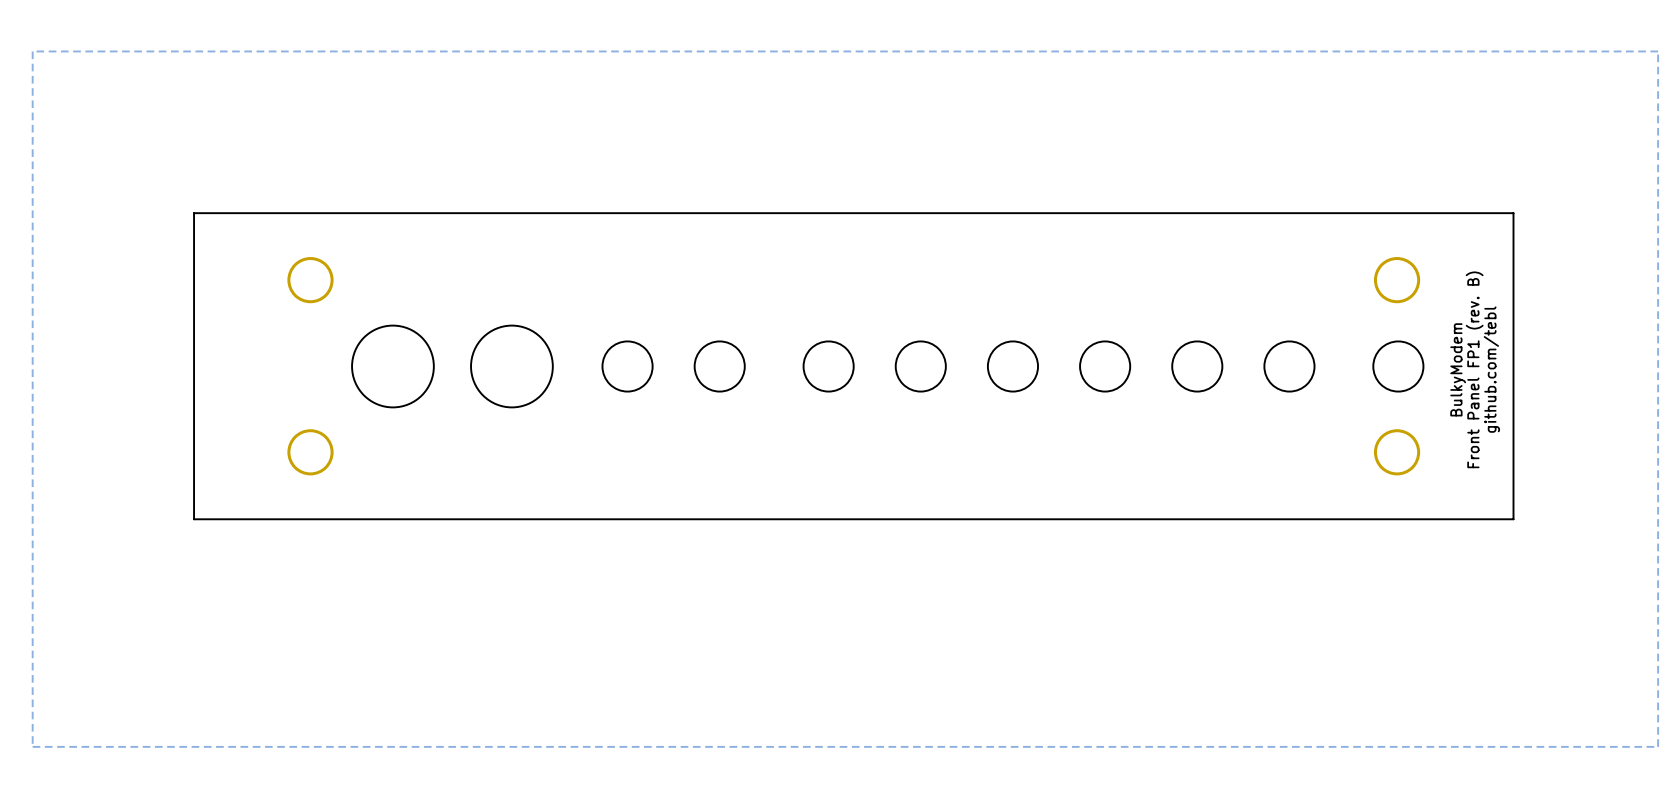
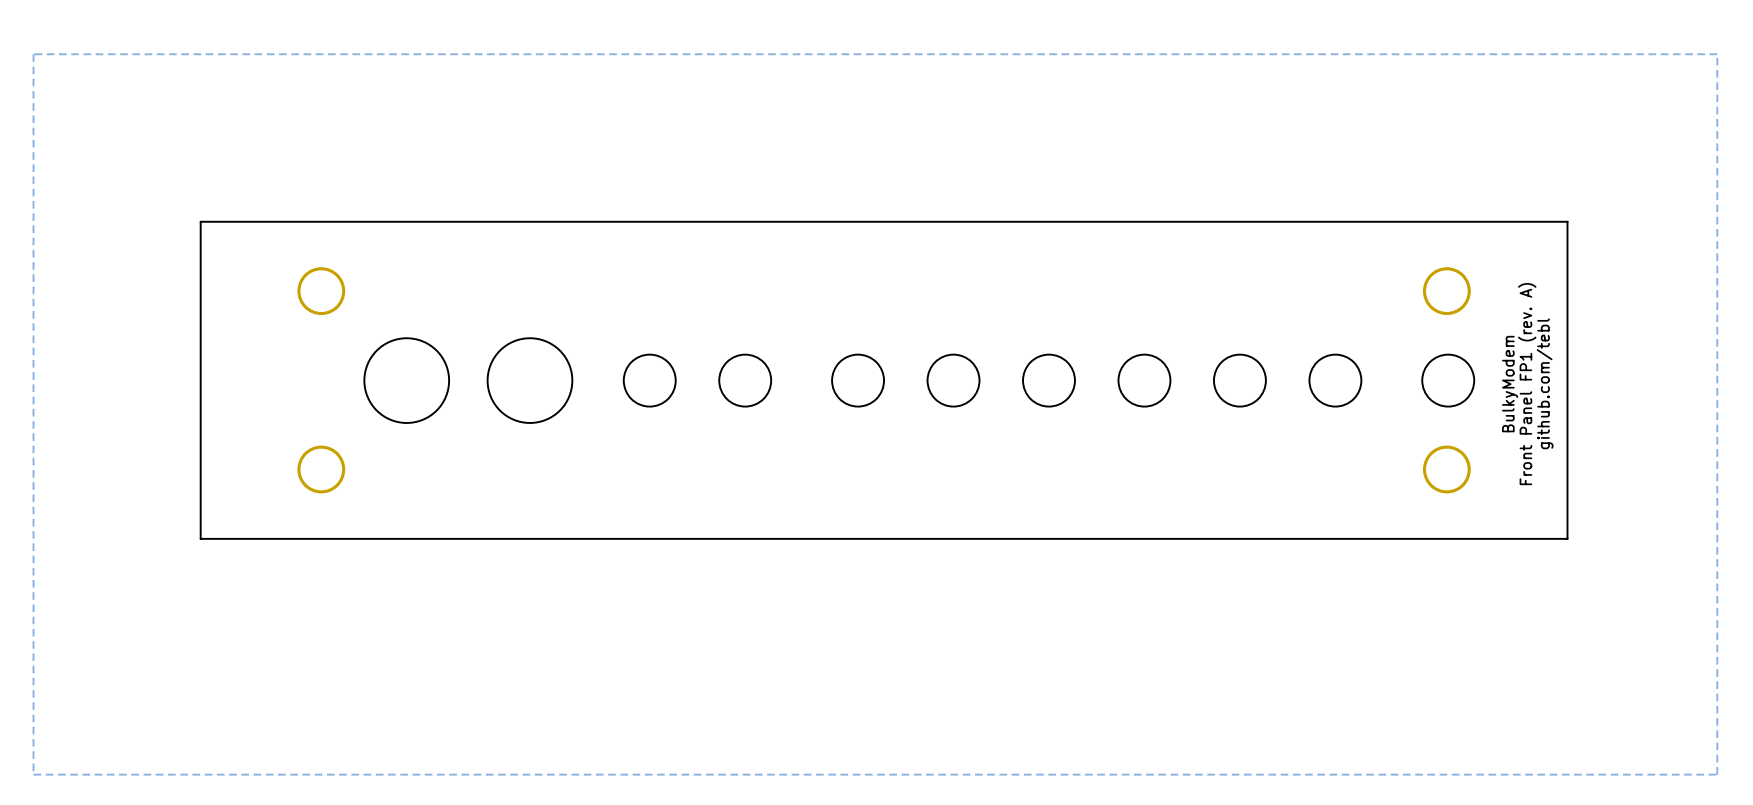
text: Front Panel FP1 (rev. B) (1474, 369) -> Front Panel FP1 (rev. A) (1527, 384)

